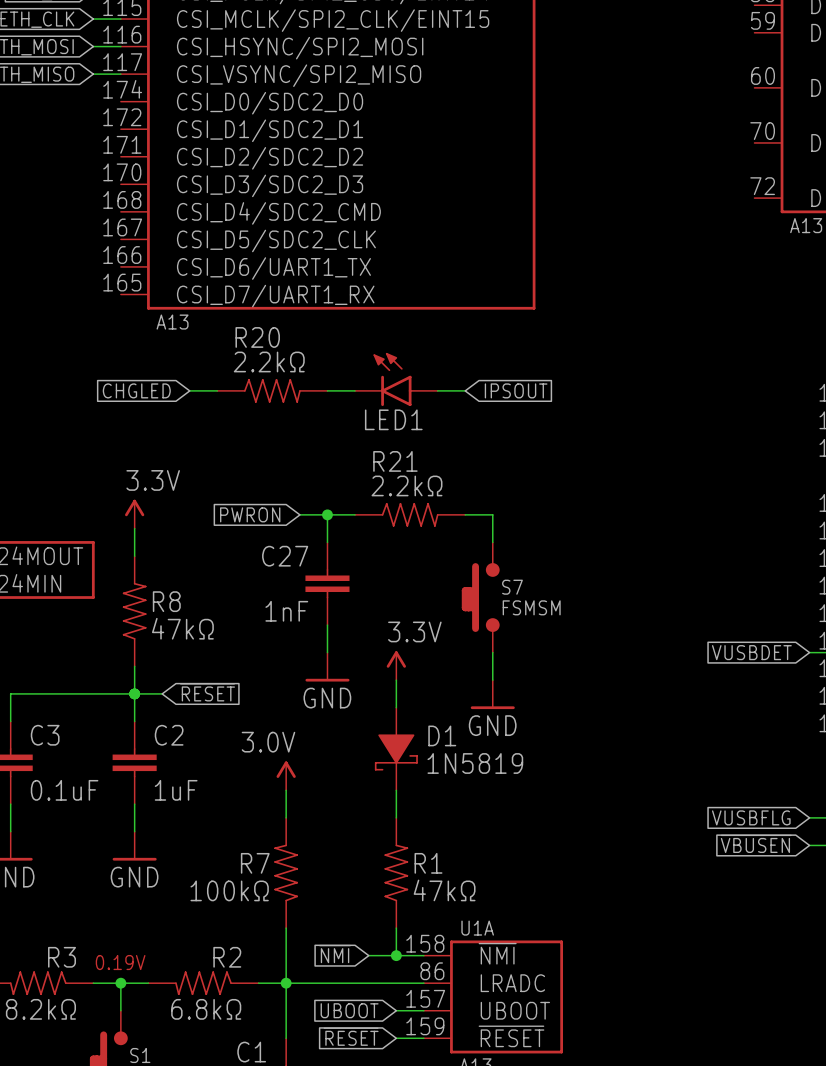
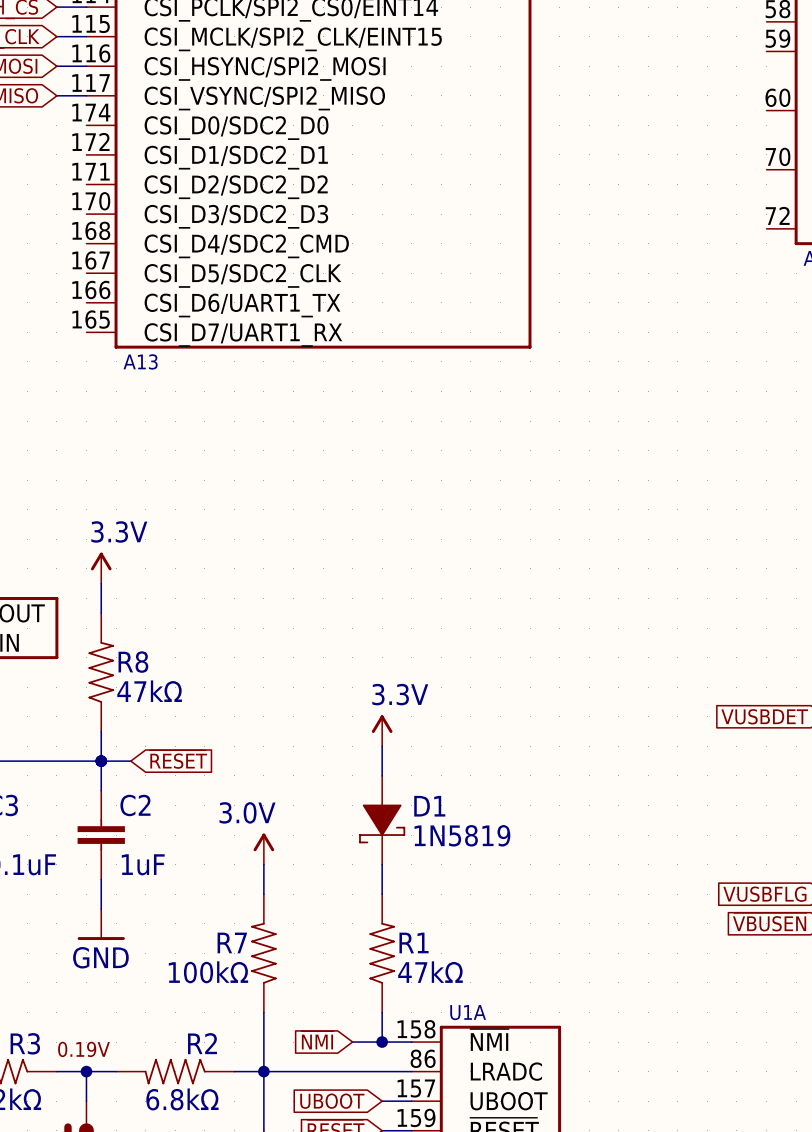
LED1: (396, 379) -> none
global label: CHGLED (136, 390) -> none
wire: (189, 390) (217, 390) -> none
R20: 2.2kΩ (272, 390) -> none
wire: (327, 390) (355, 390) -> none
wire: (437, 390) (465, 390) -> none
global label: IPSOUT (516, 390) -> none
global label: PWRON (250, 514) -> none
wire: (299, 514) (355, 514) -> none
wire: (327, 514) (327, 542) -> none
junction: (327, 514) -> none
R21: 2.2kΩ (410, 514) -> none
wire: (465, 514) (492, 514) (492, 542) -> none
C27: 1nF (327, 583) -> none
S7: FSMSM (480, 597) -> none
wire: (327, 625) (327, 652) -> none
wire: (492, 652) (492, 680) -> none
power symbol: GND (327, 667) -> none
power symbol: GND (492, 694) -> none

